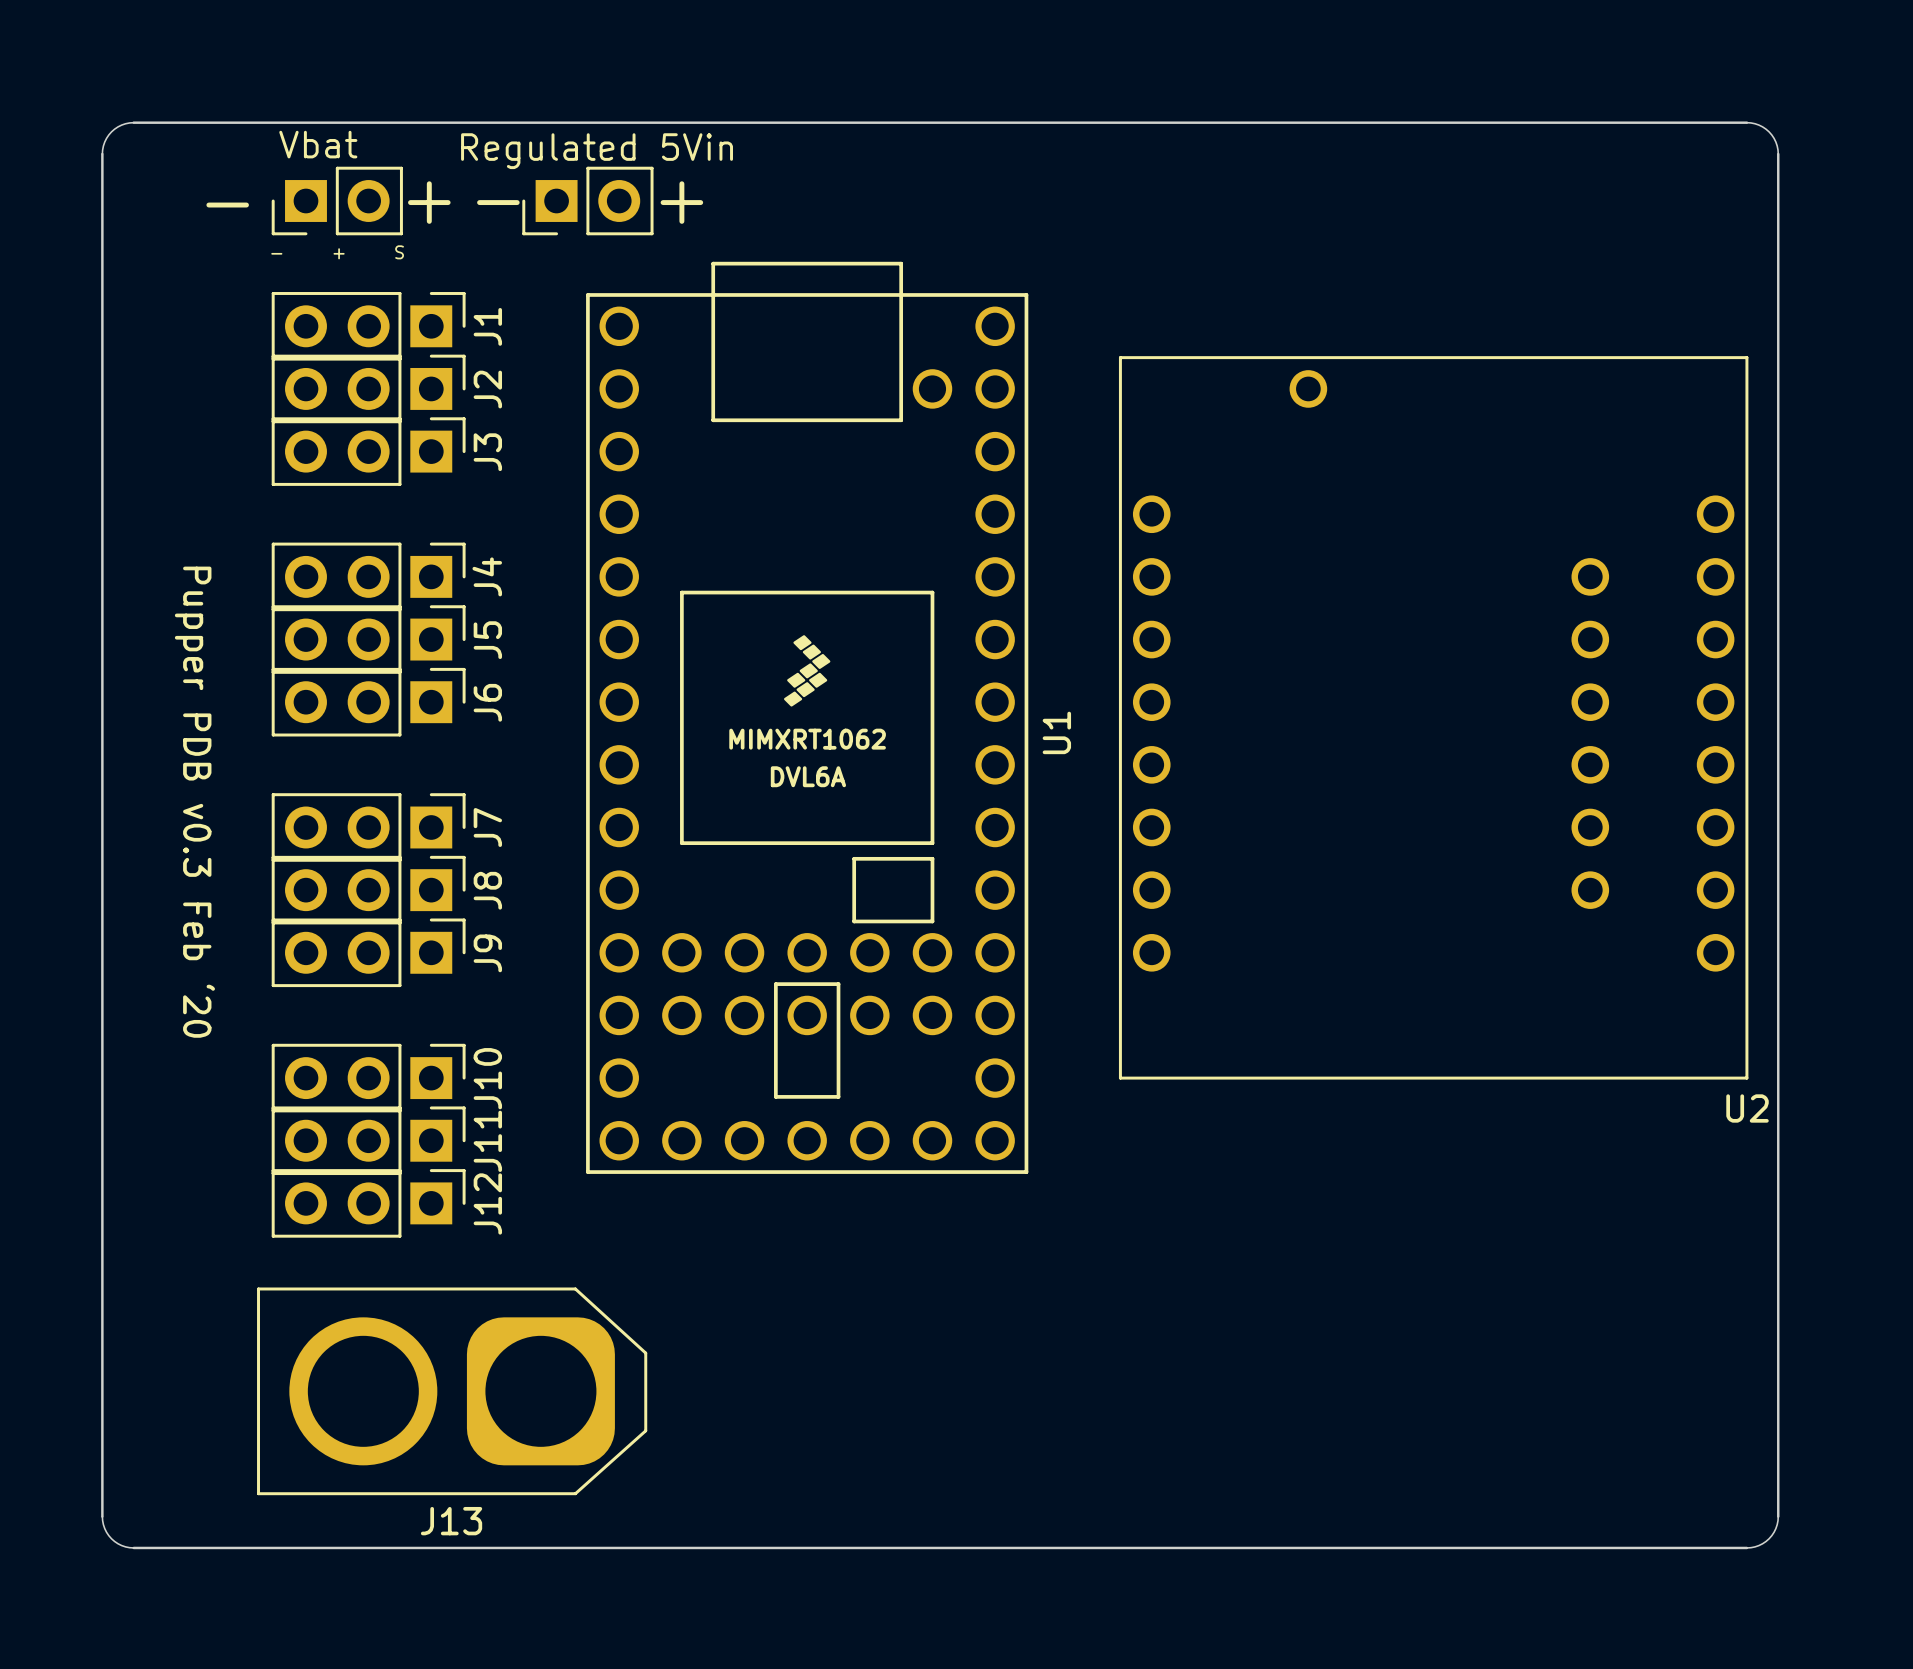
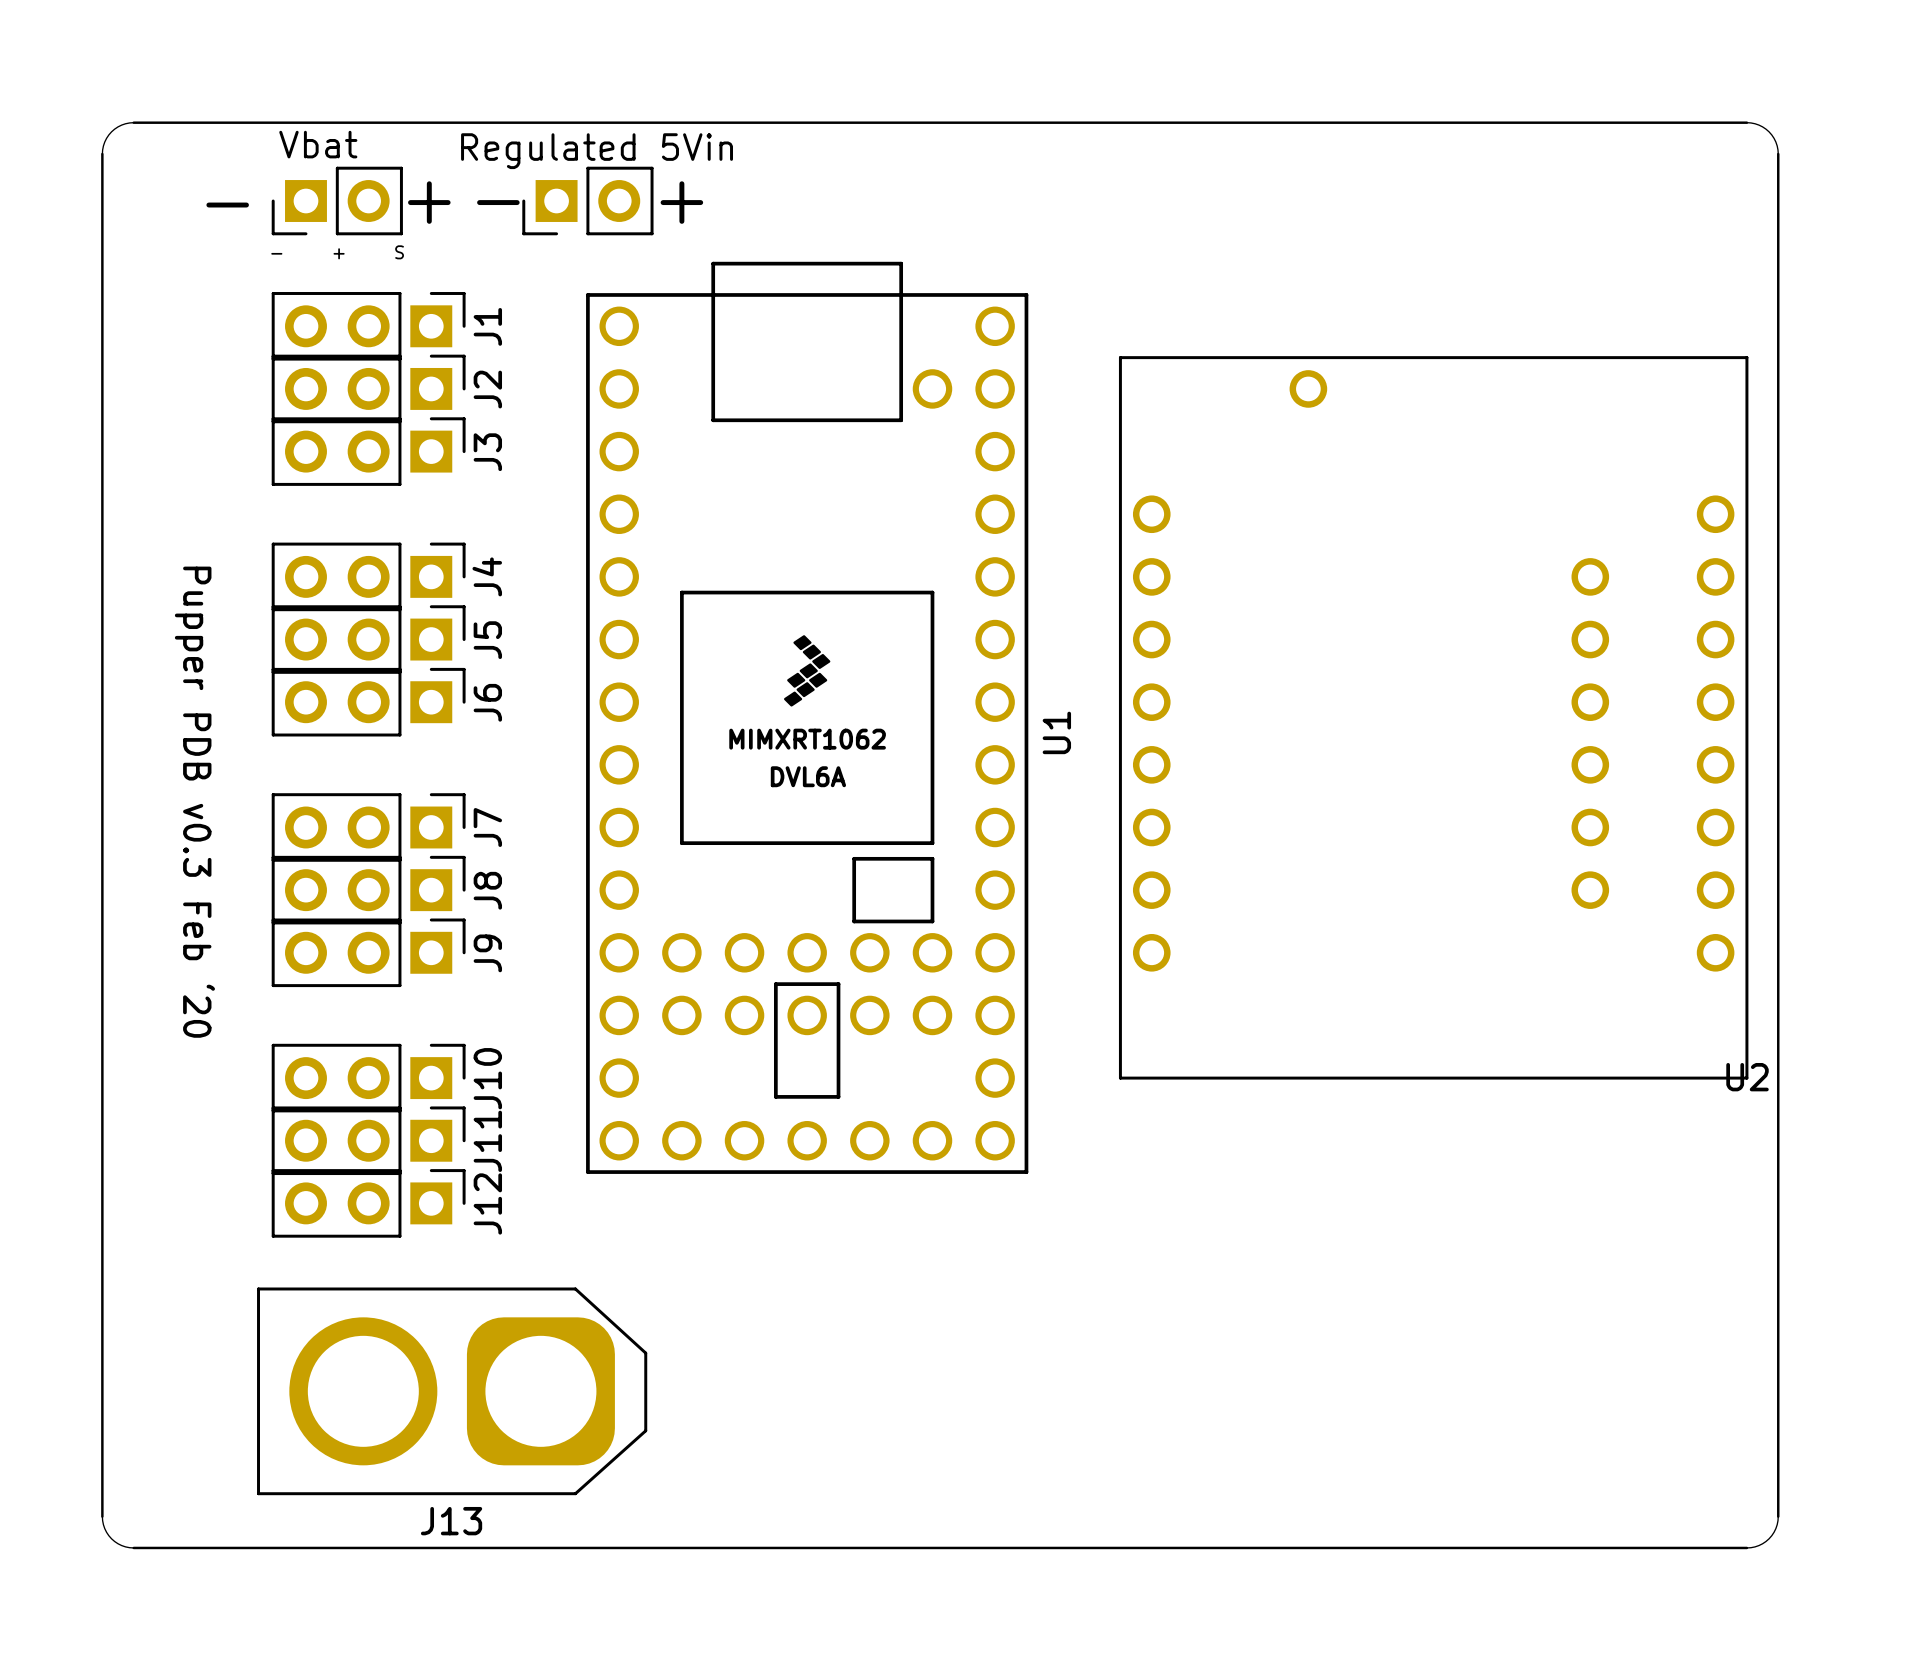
U2 name position: U2 (1747, 1108) -> U2 (1747, 1077)

